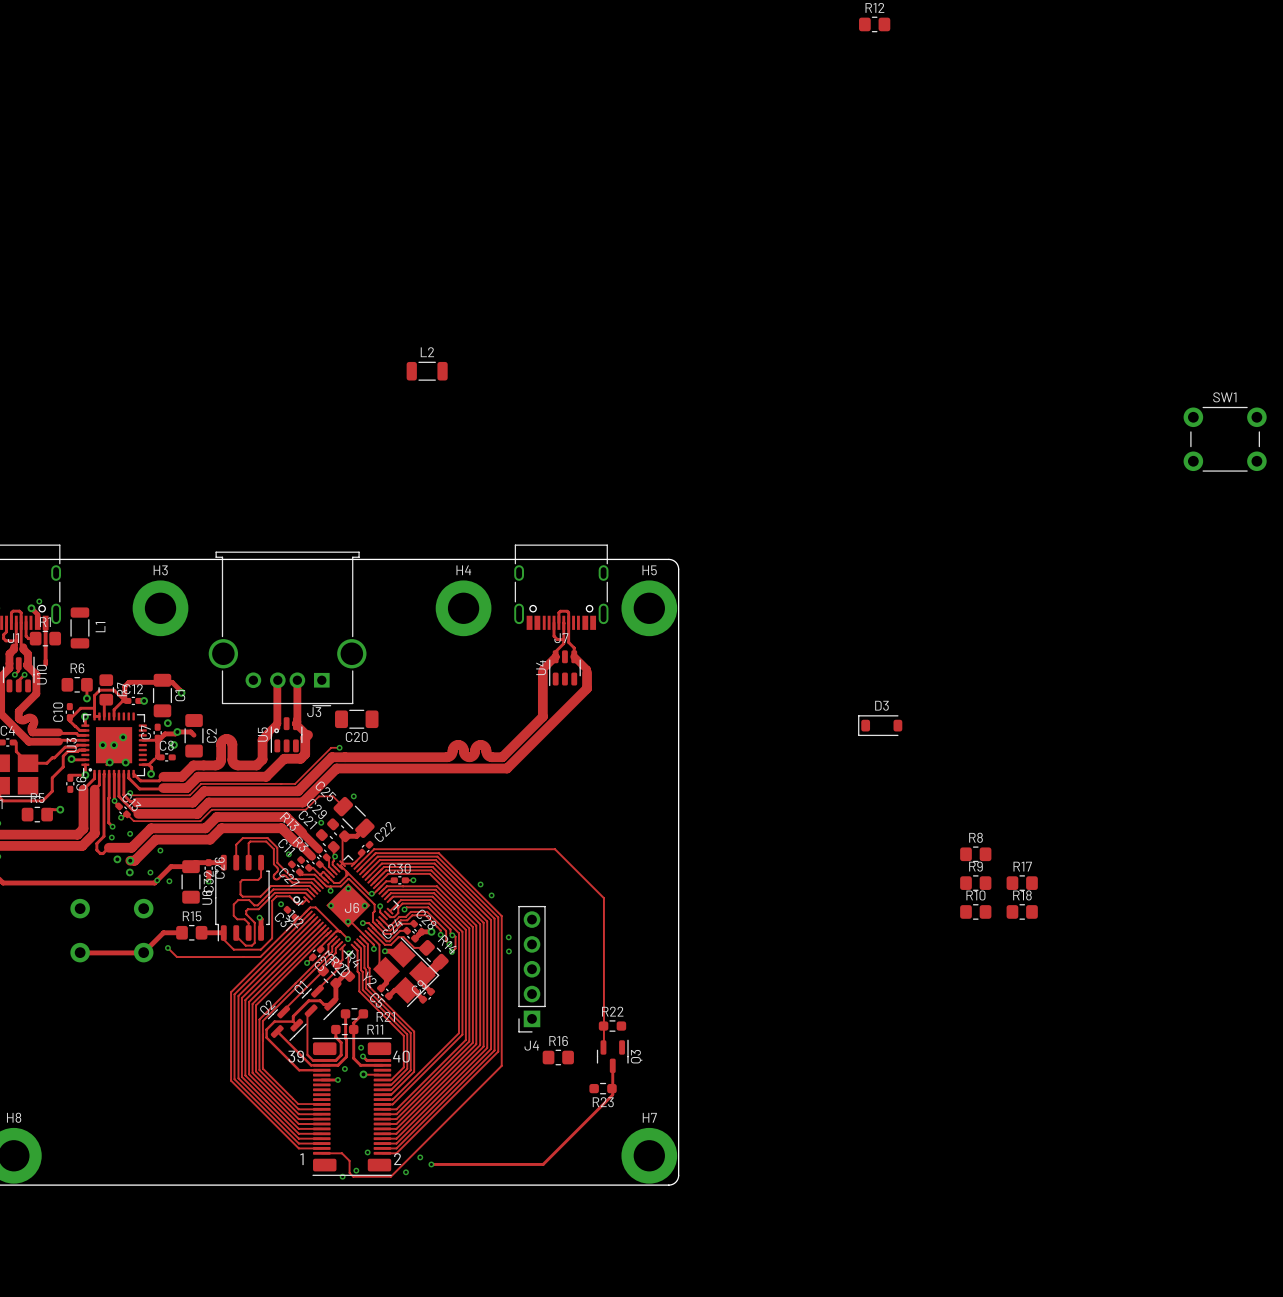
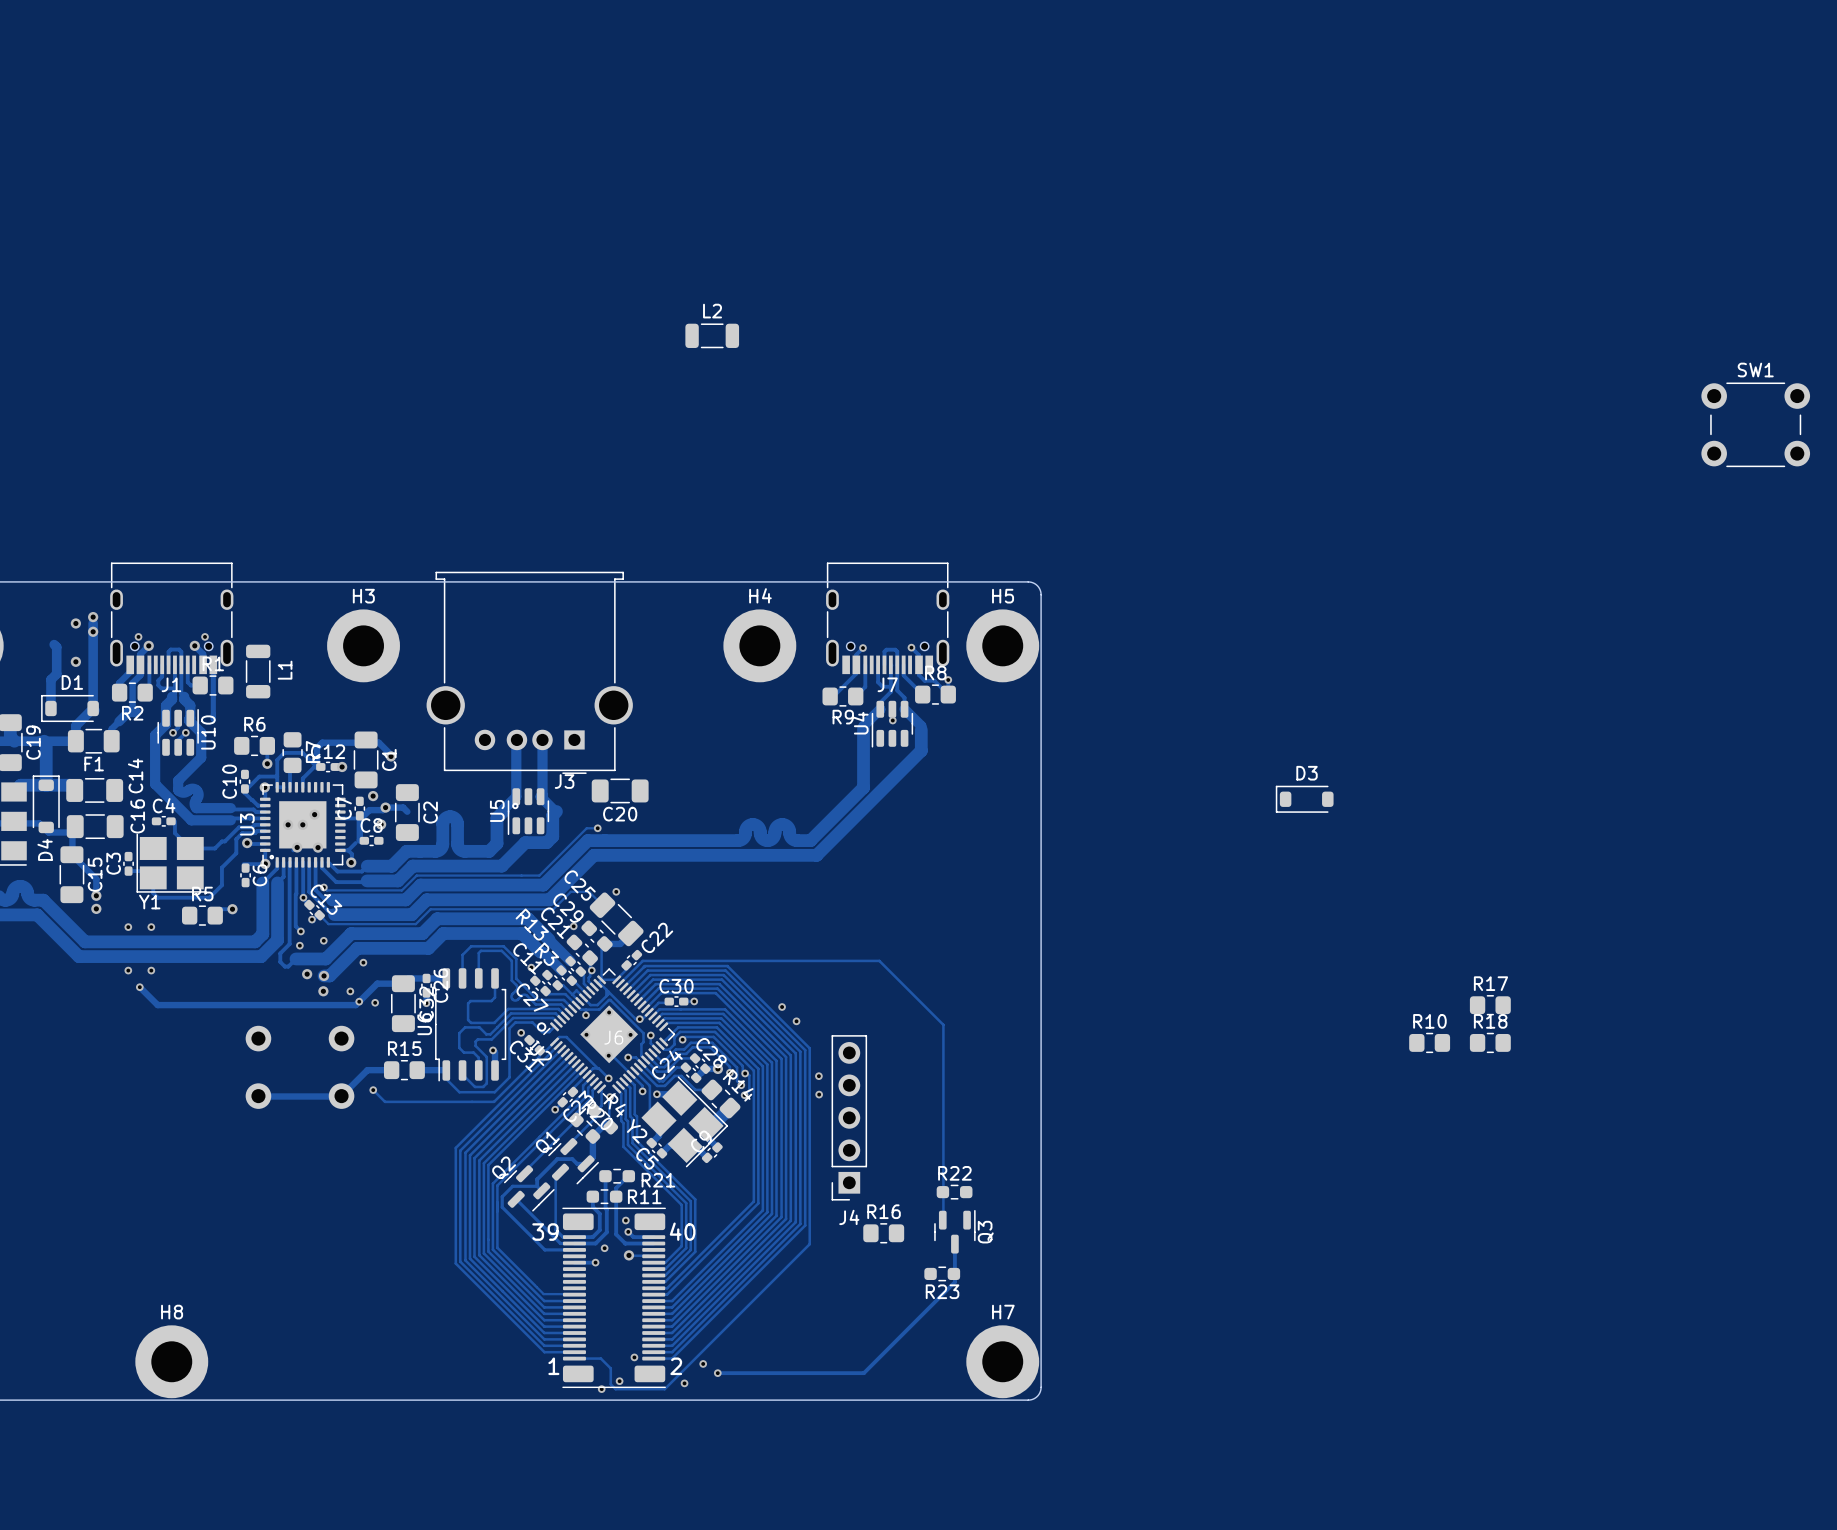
track: none -> (863, 648) (856, 654) (856, 673) (833, 696) (830, 696)
via: none -> (863, 648)
track: none -> (911, 647) (919, 655) (919, 675) (924, 680) (934, 680) (948, 694) (948, 679)
via: none -> (911, 647)
track: none -> (865, 664) (865, 686) (855, 696)
track: none -> (903, 664) (903, 675) (922, 694)
via: none -> (948, 679)
via: none -> (892, 720)
R8 position: (975, 854) -> (935, 694)
R9 name position: R9 (975, 866) -> R9 (843, 717)
R9 position: (975, 883) -> (842, 696)

